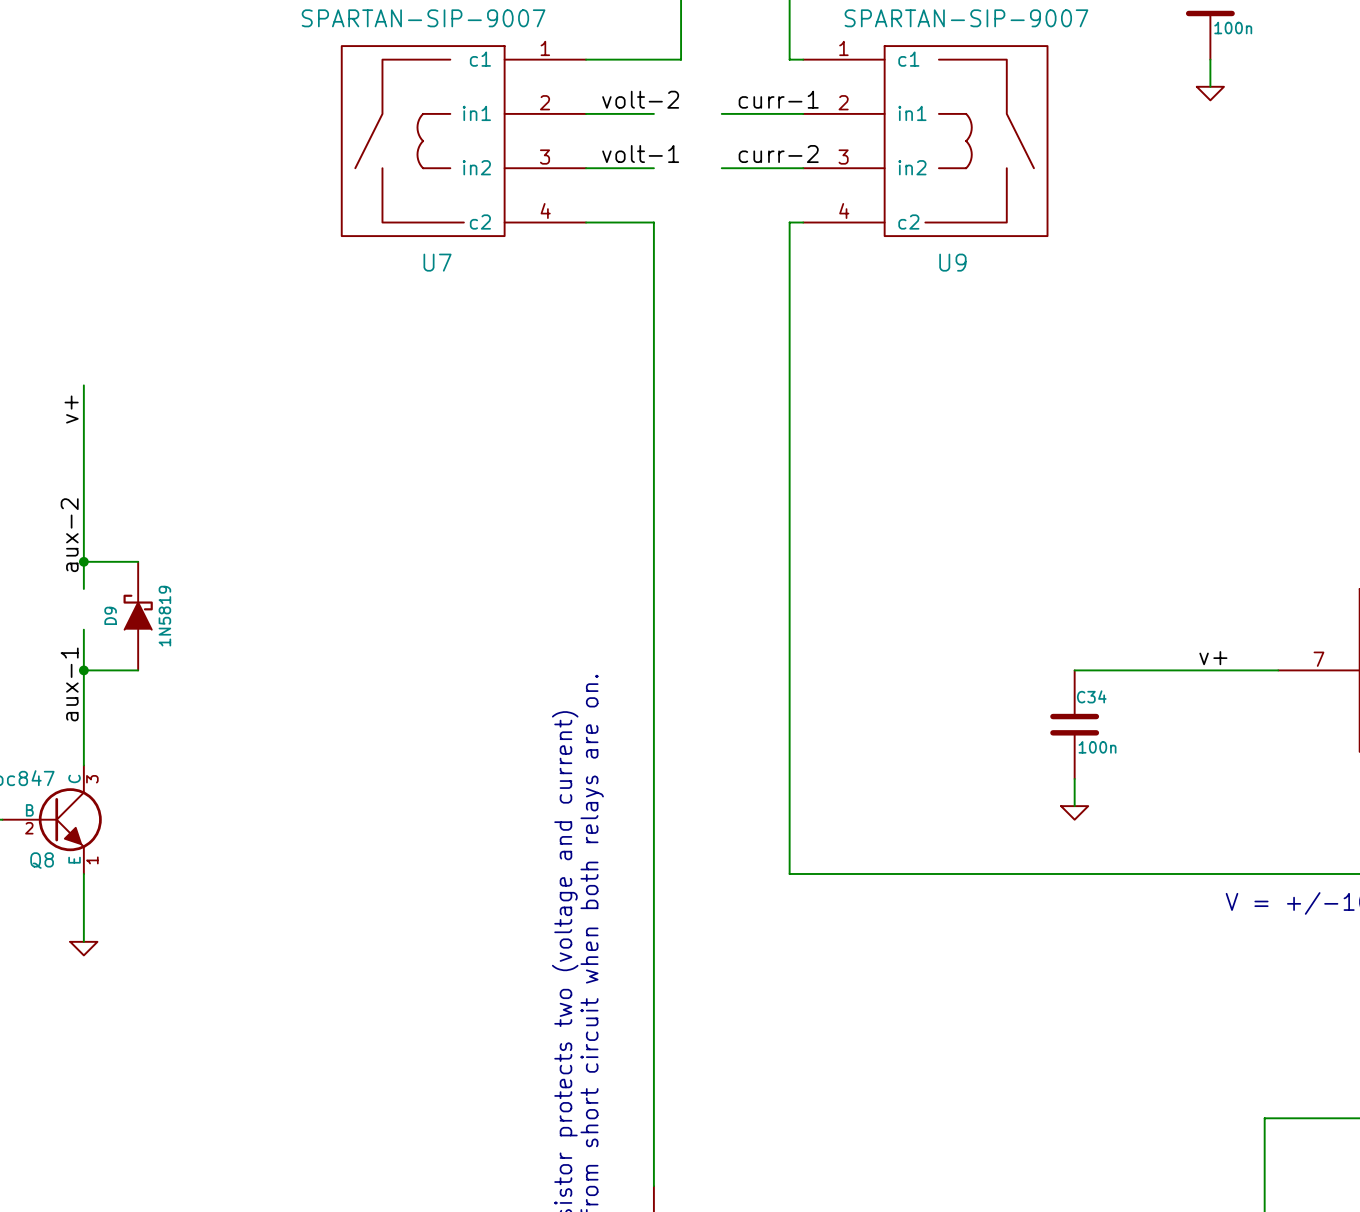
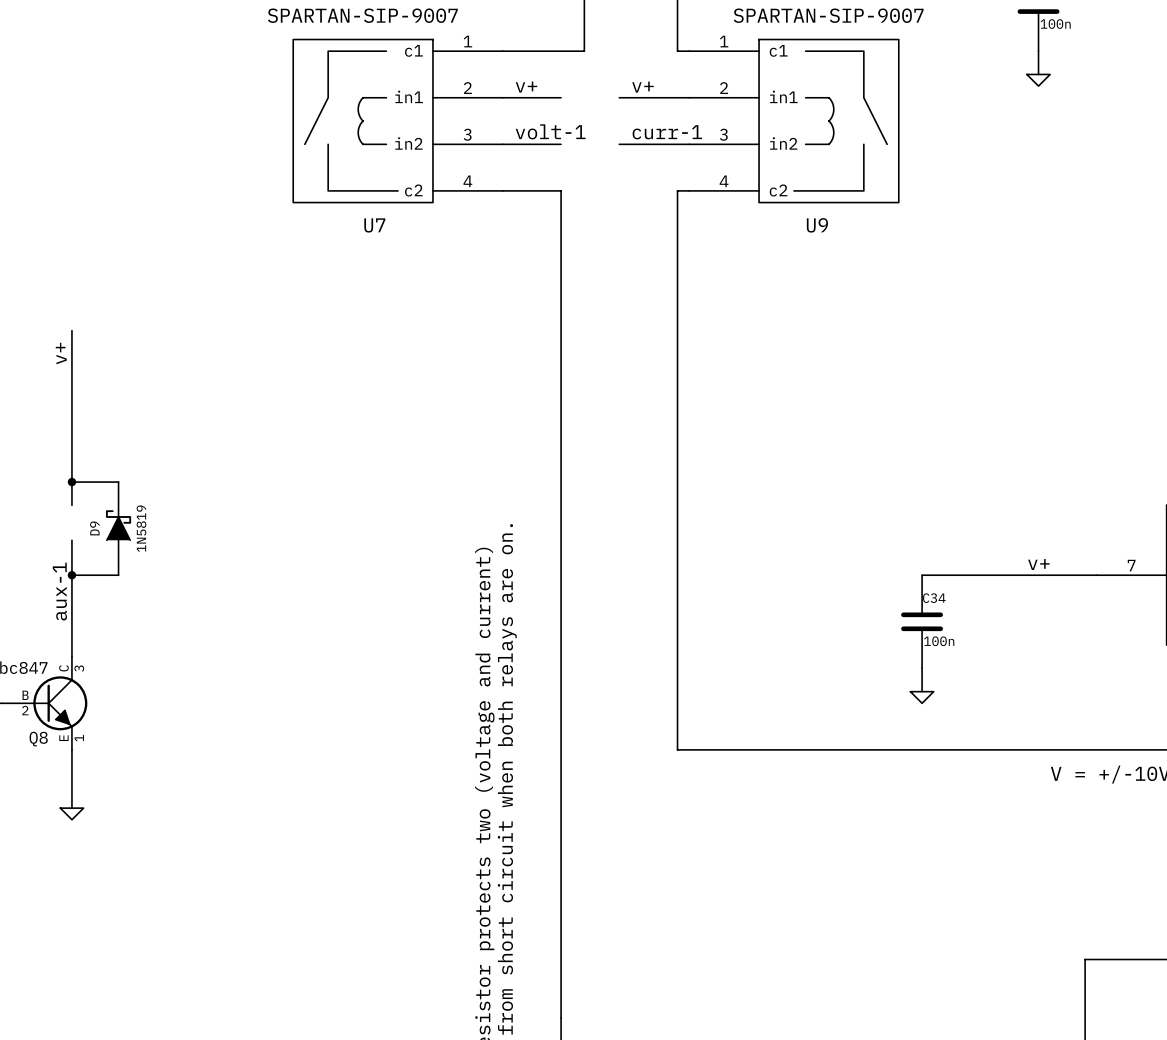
label: volt-2 (640, 99) -> v+ (526, 87)
label: curr-1 (778, 99) -> v+ (642, 87)
label: curr-2 (778, 154) -> curr-1 (667, 132)
label: aux-2 (69, 535) -> none

